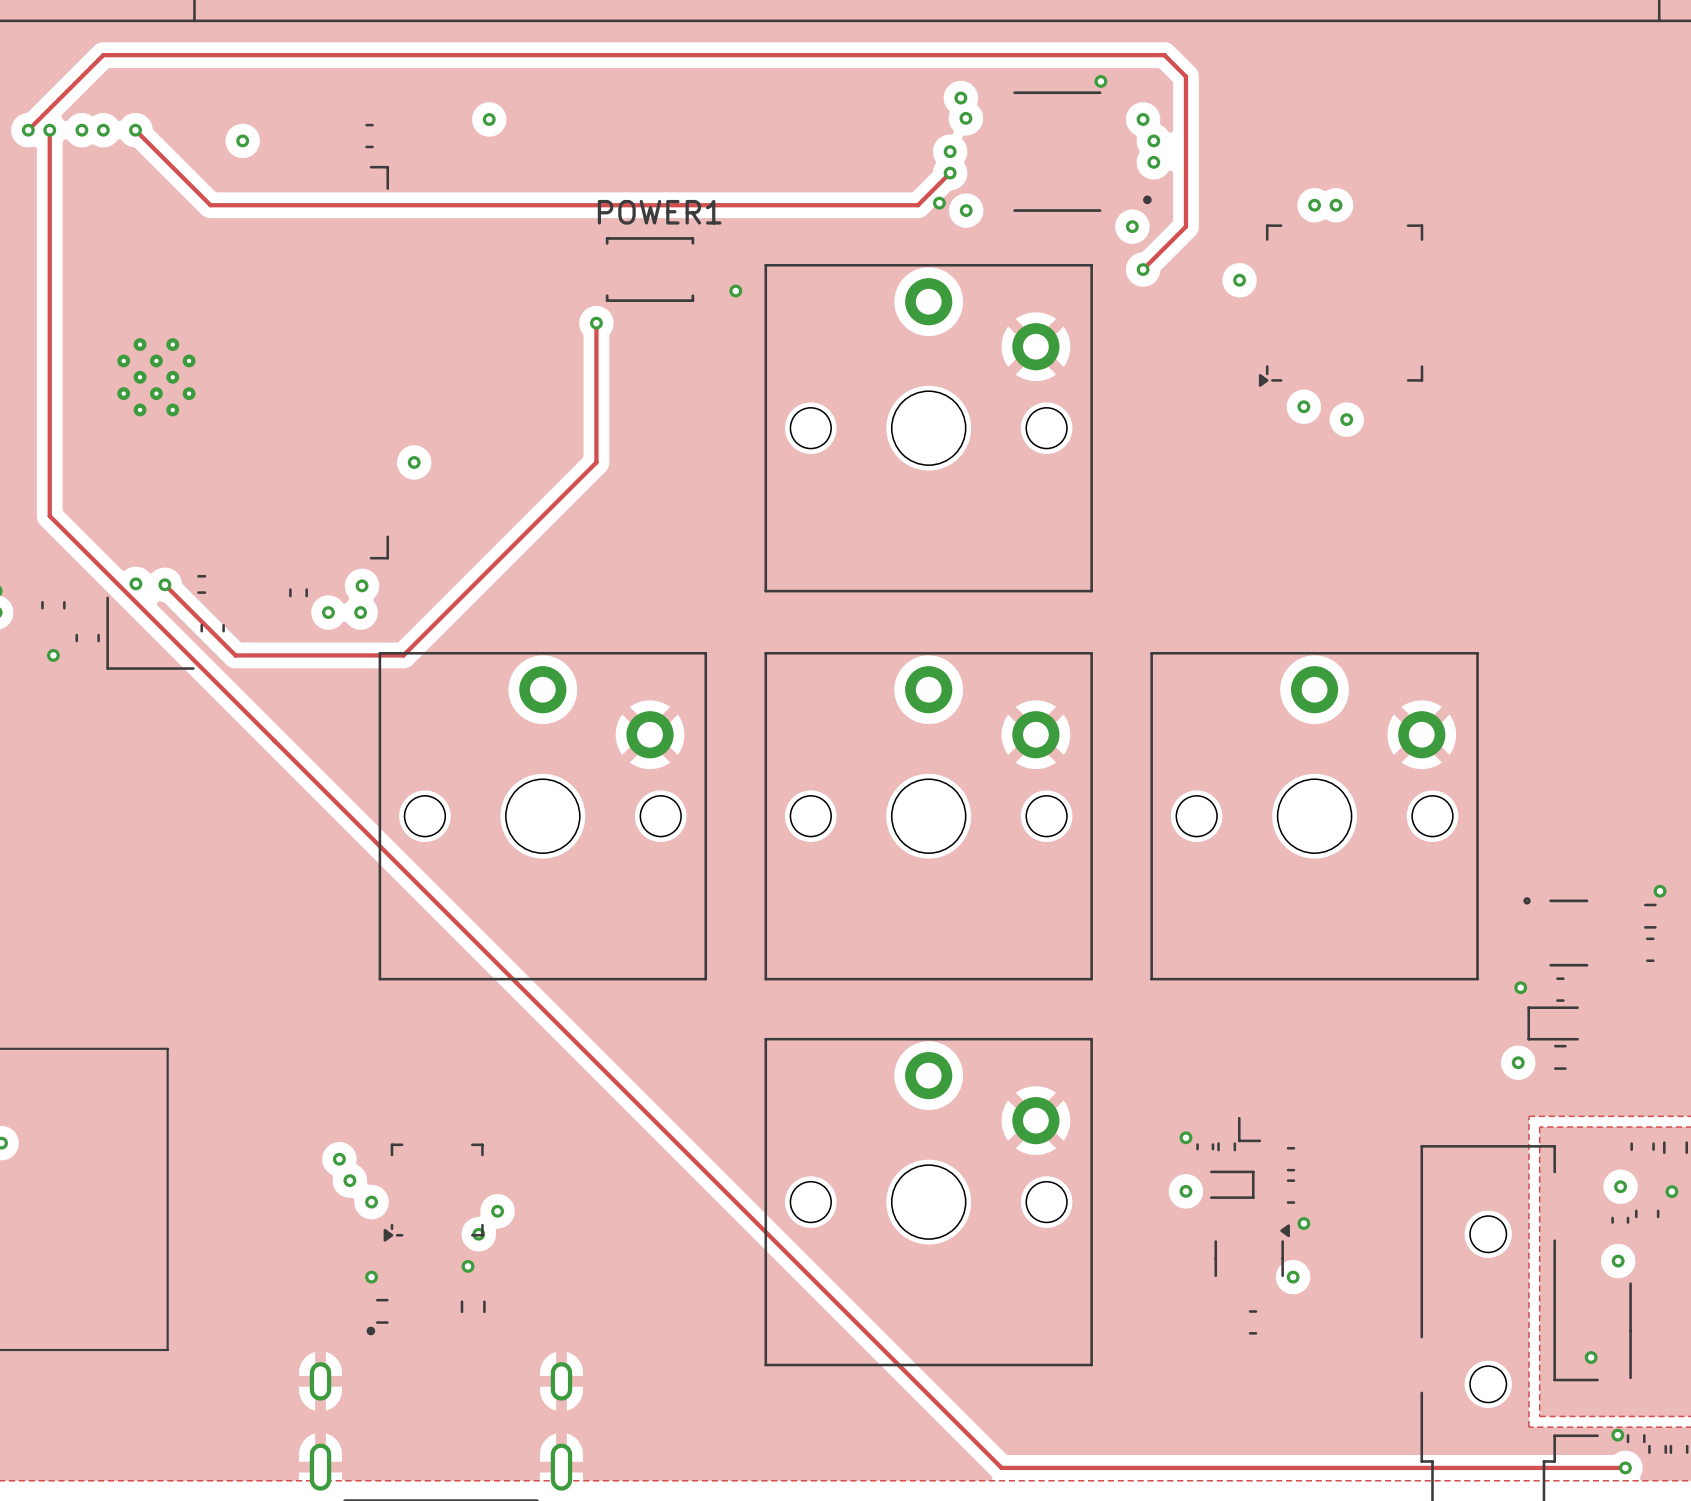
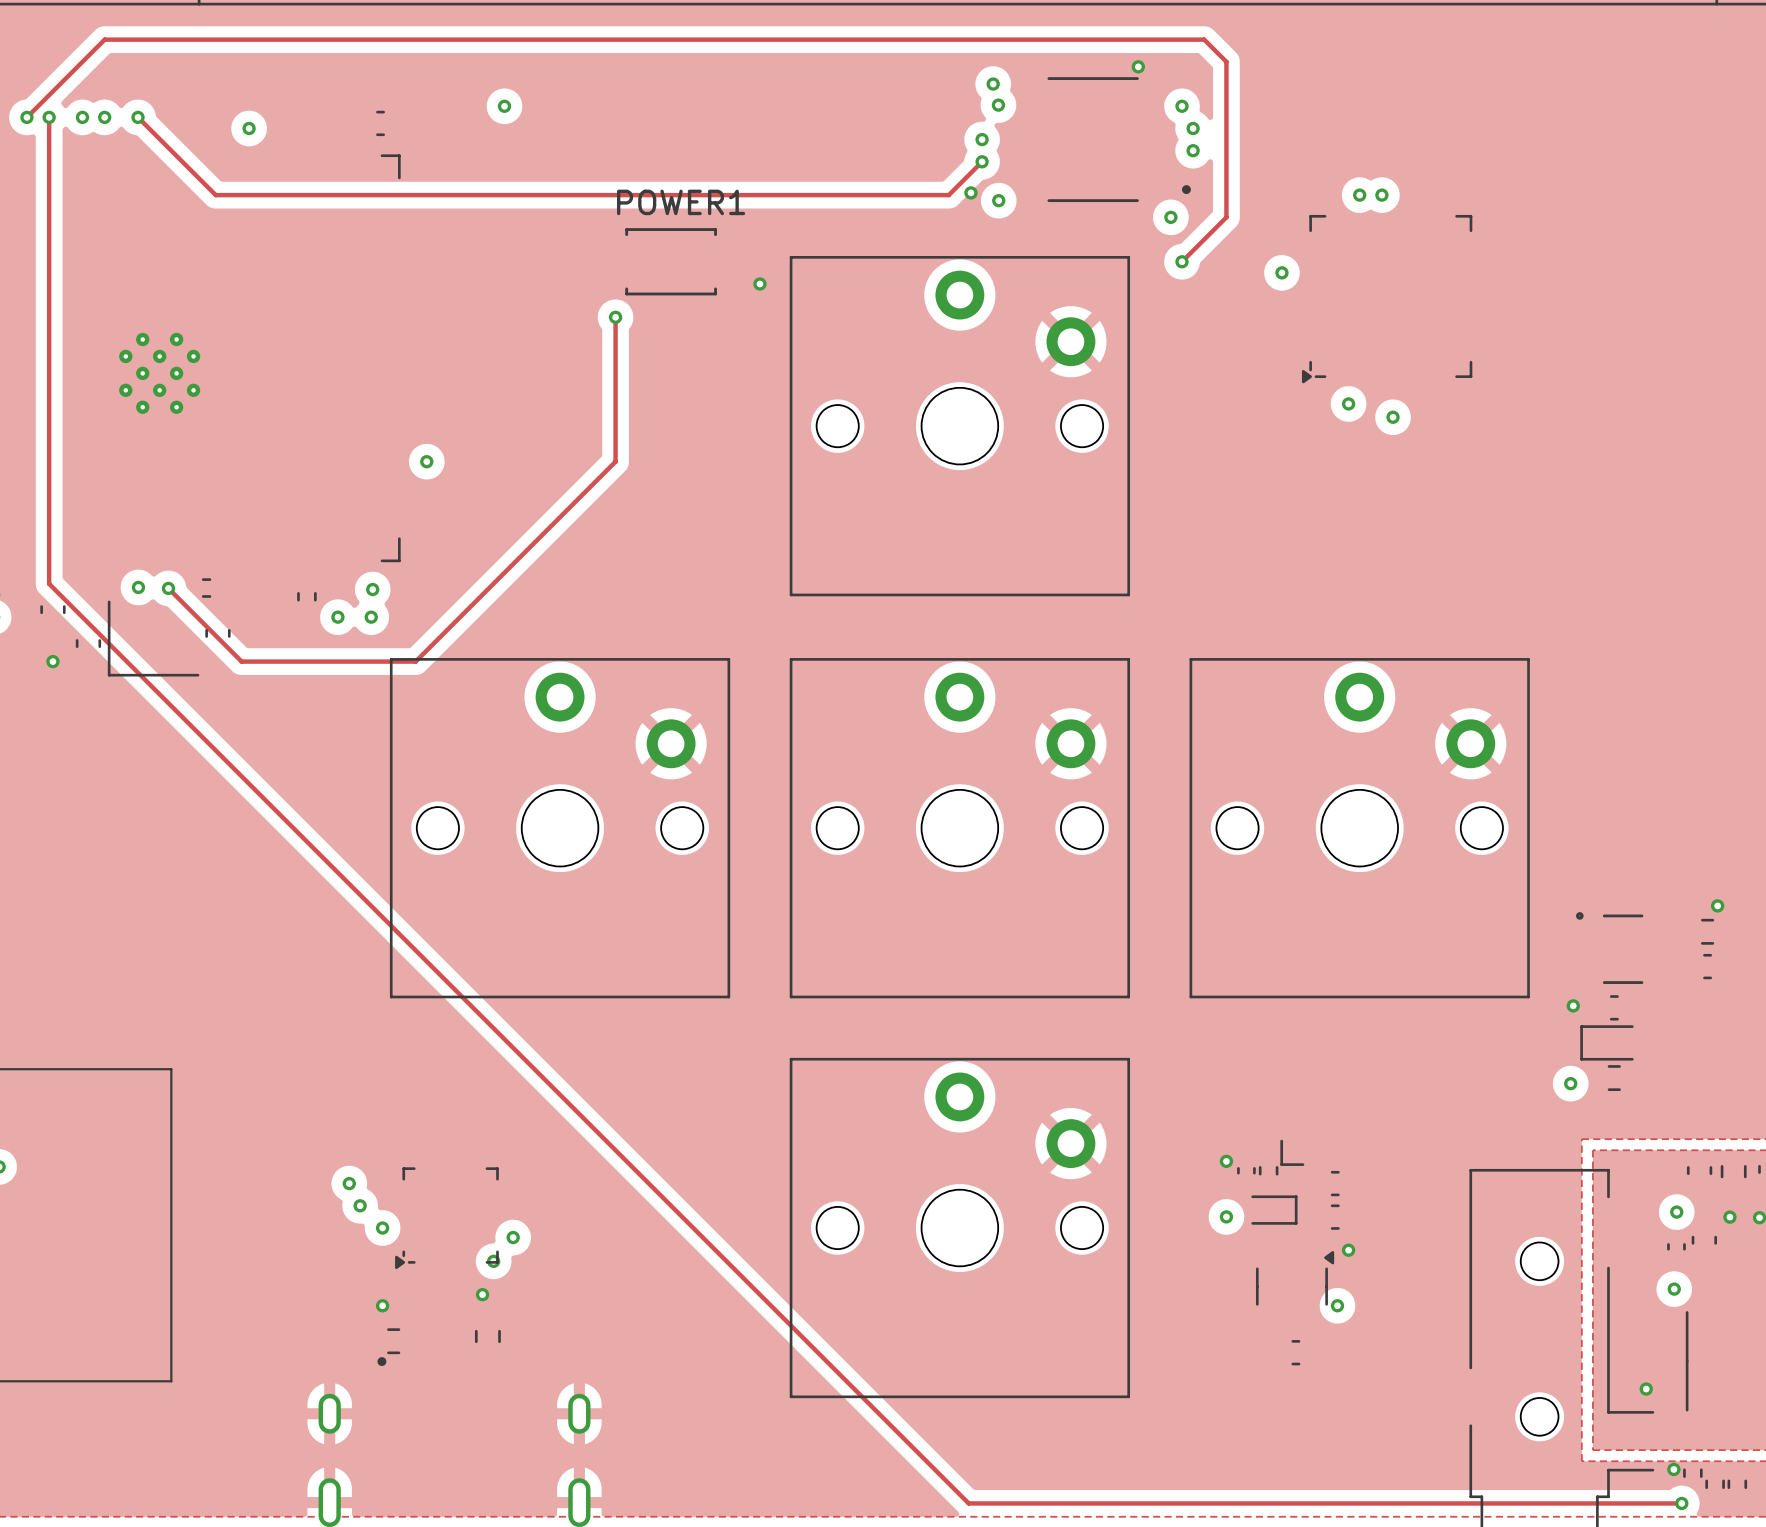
track: (49, 516) (1001, 1467) -> (49, 517) (49, 583) (968, 1503) (1035, 1503)

